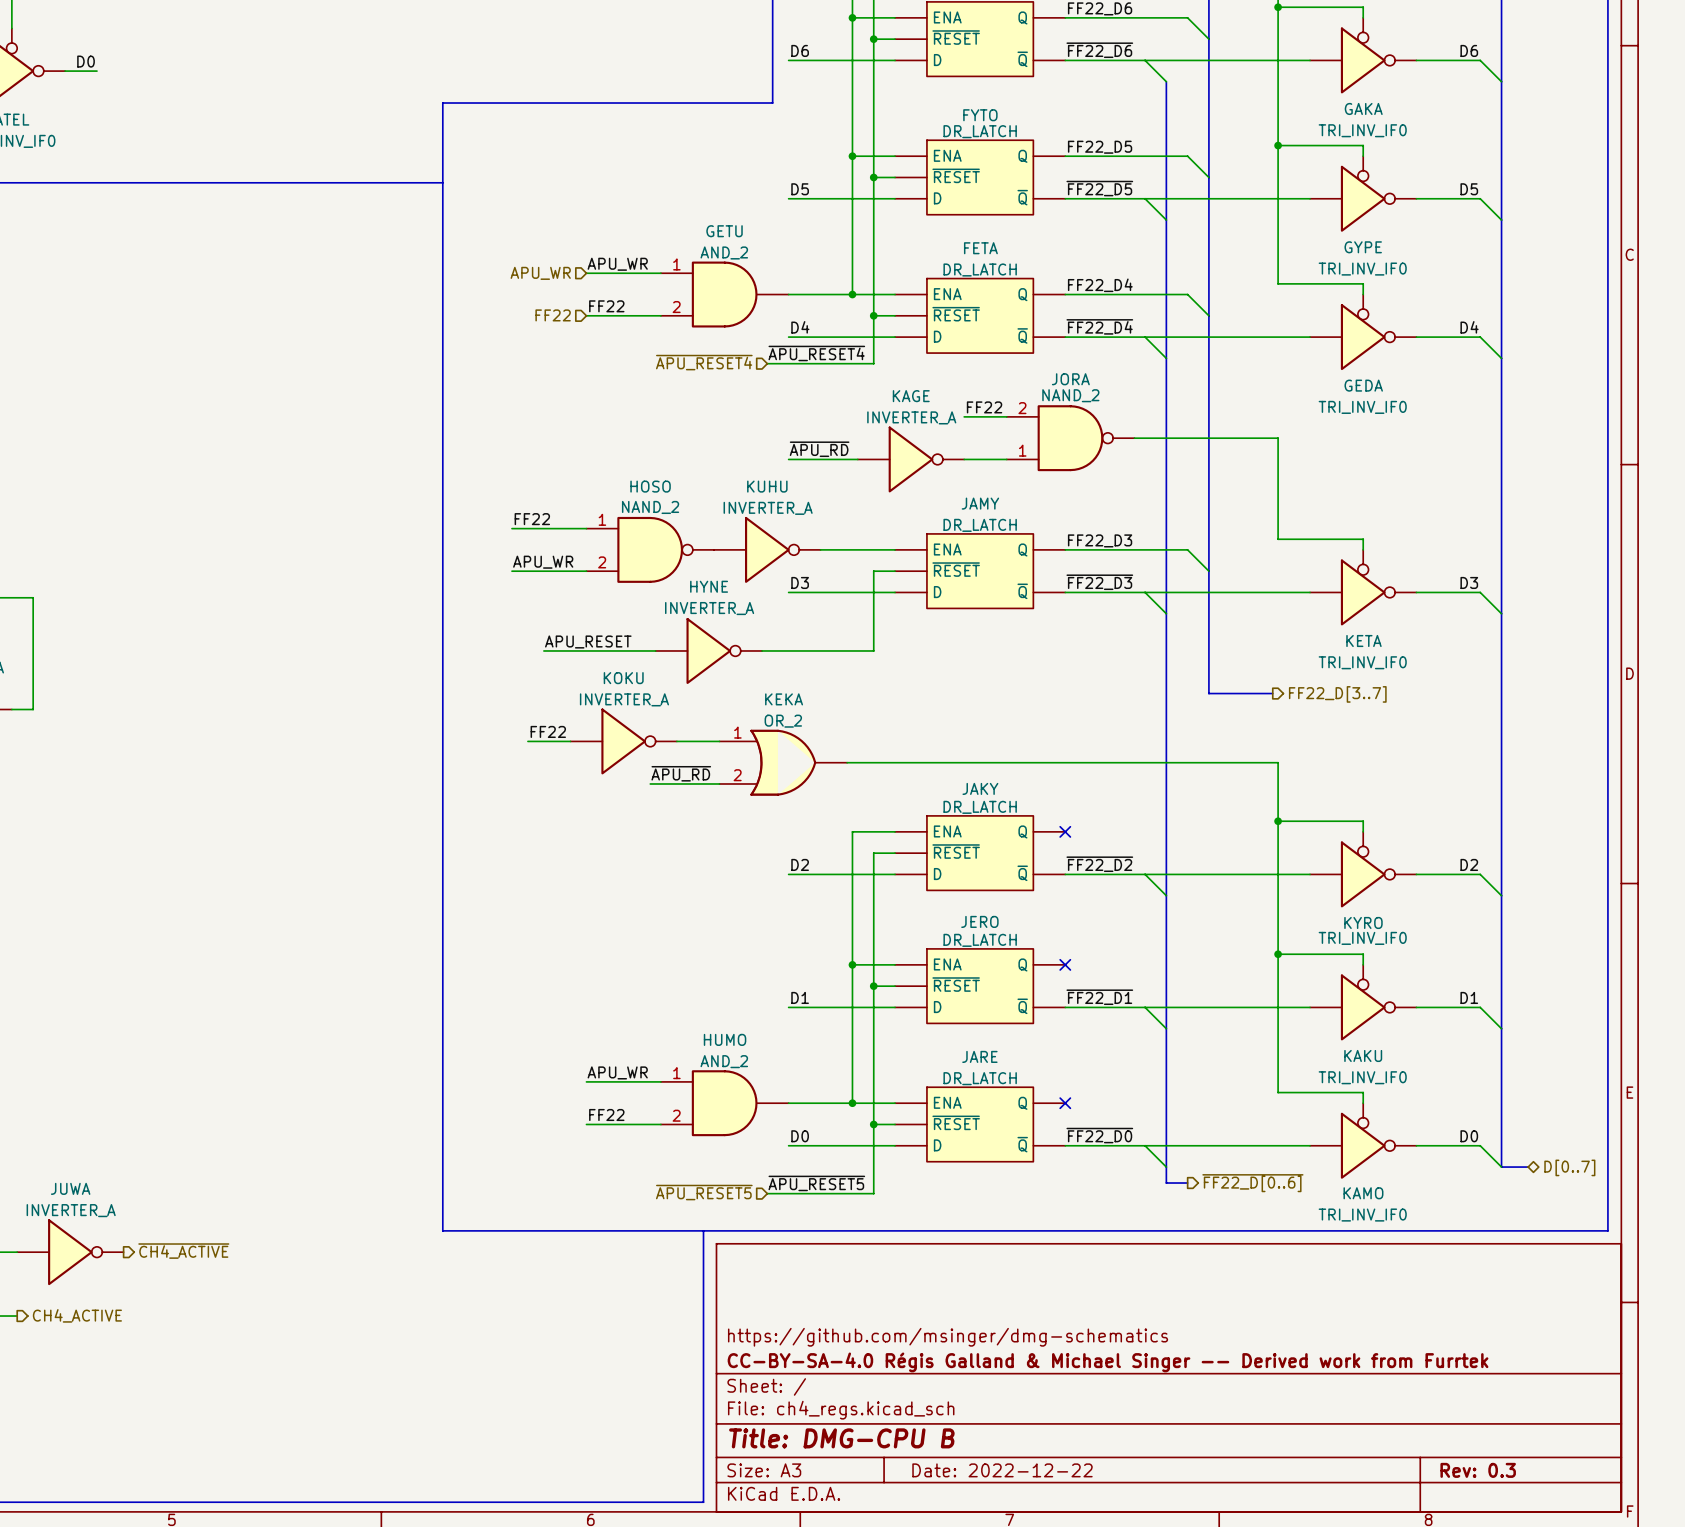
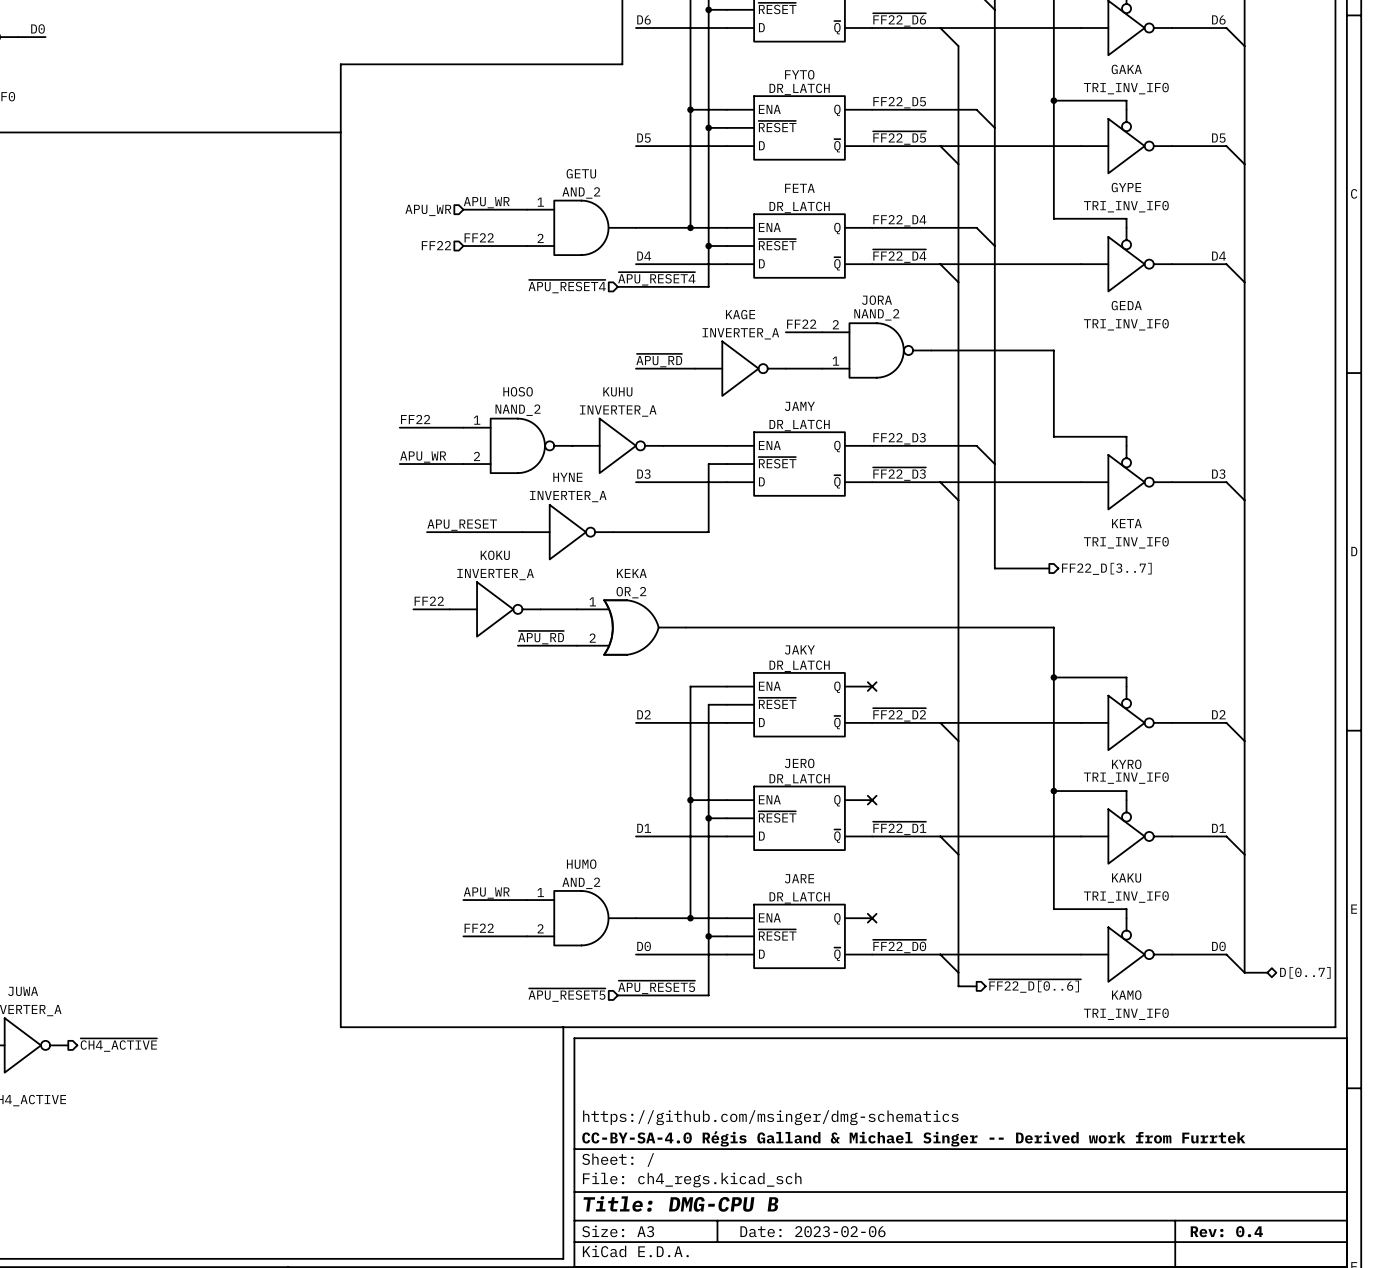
title block: Date: 2022-12-22 (1002, 1470) -> Date: 2023-02-06 (812, 1231)
title block: Rev: 0.3 (1478, 1470) -> Rev: 0.4 (1226, 1231)

